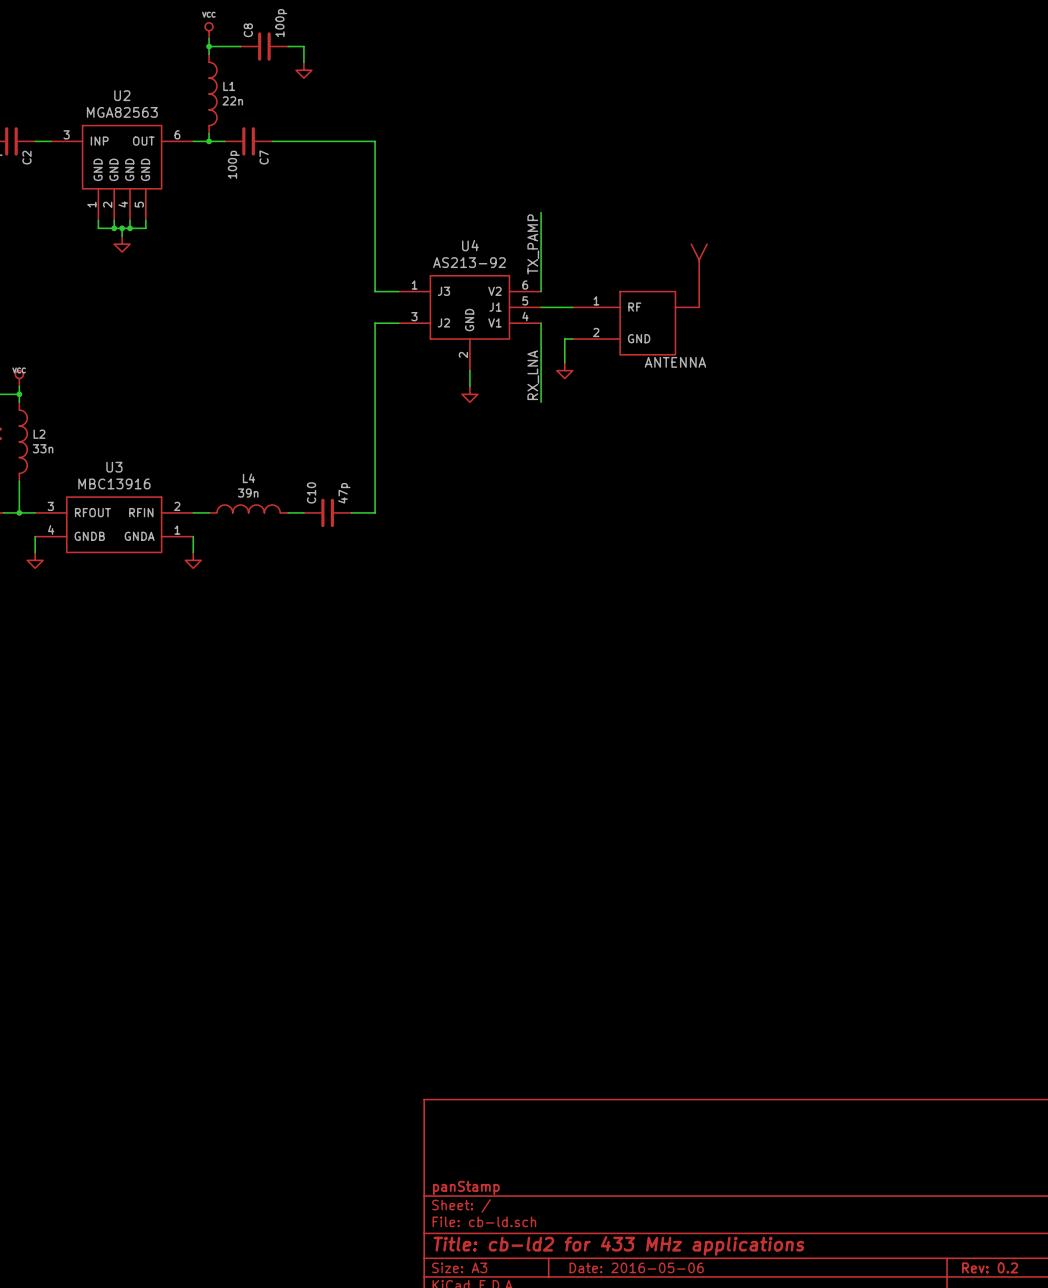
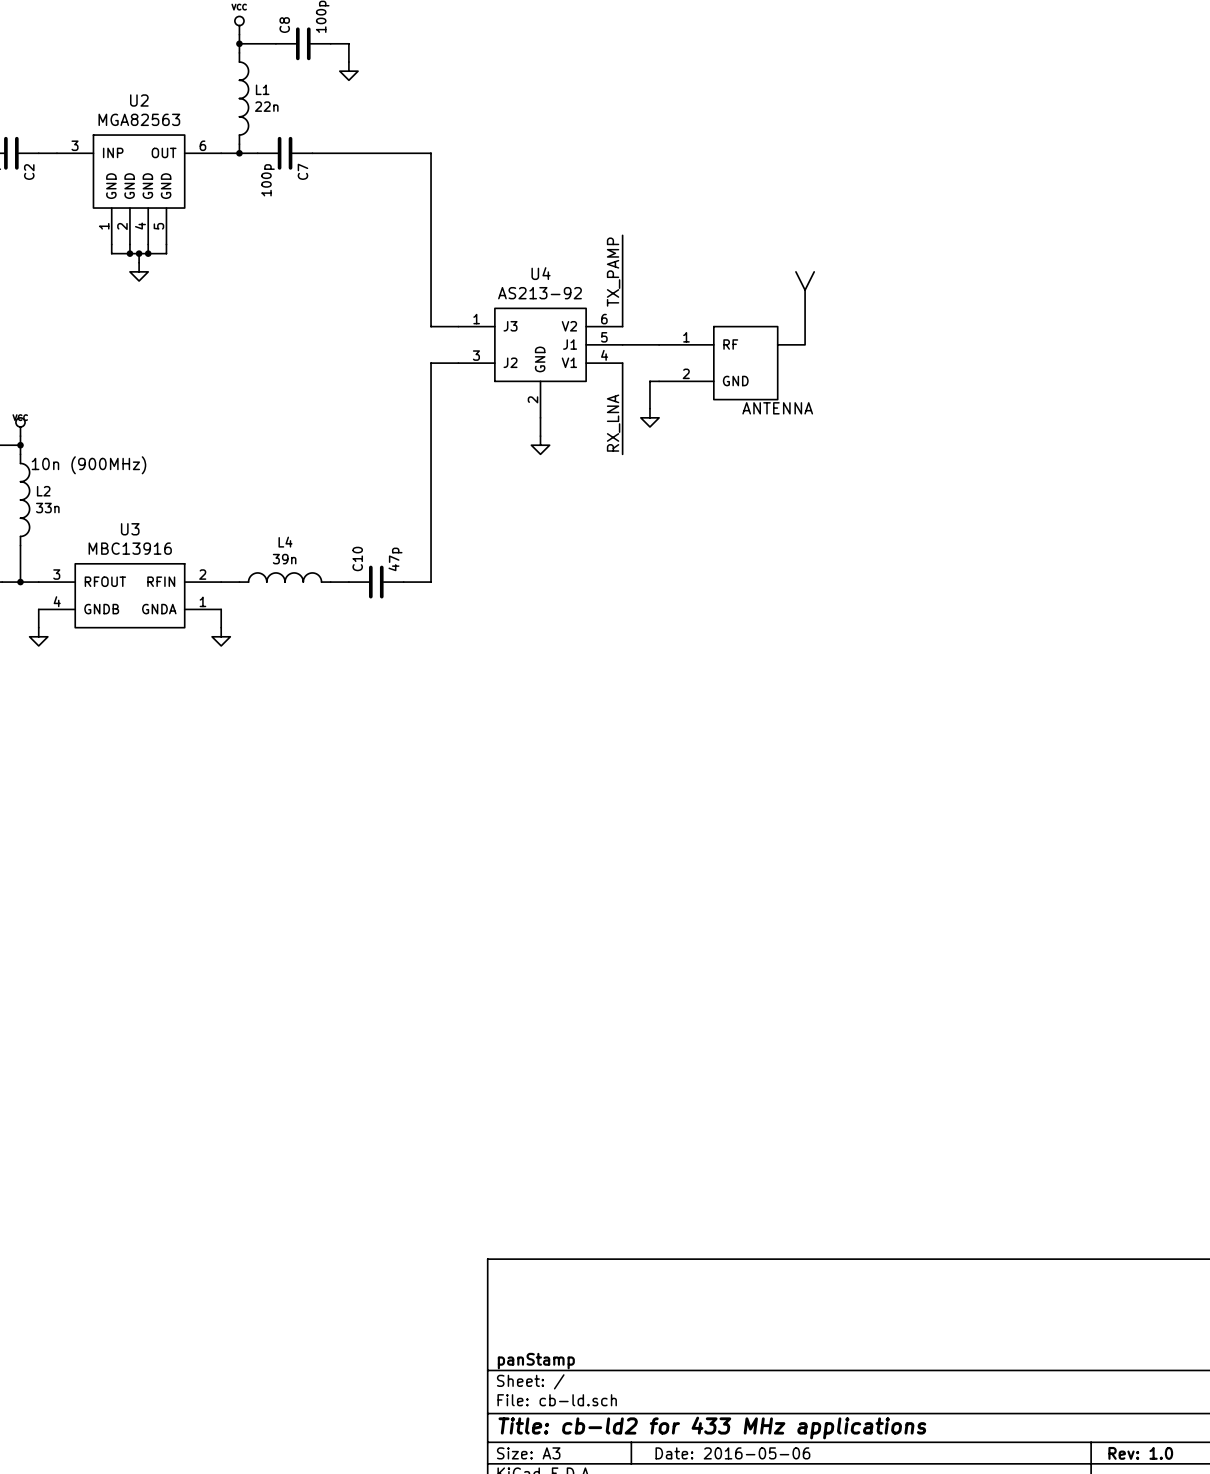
text: none -> 10n (900MHz) (88, 465)
title block: Rev: 0.2 (990, 1267) -> Rev: 1.0 (1140, 1453)

